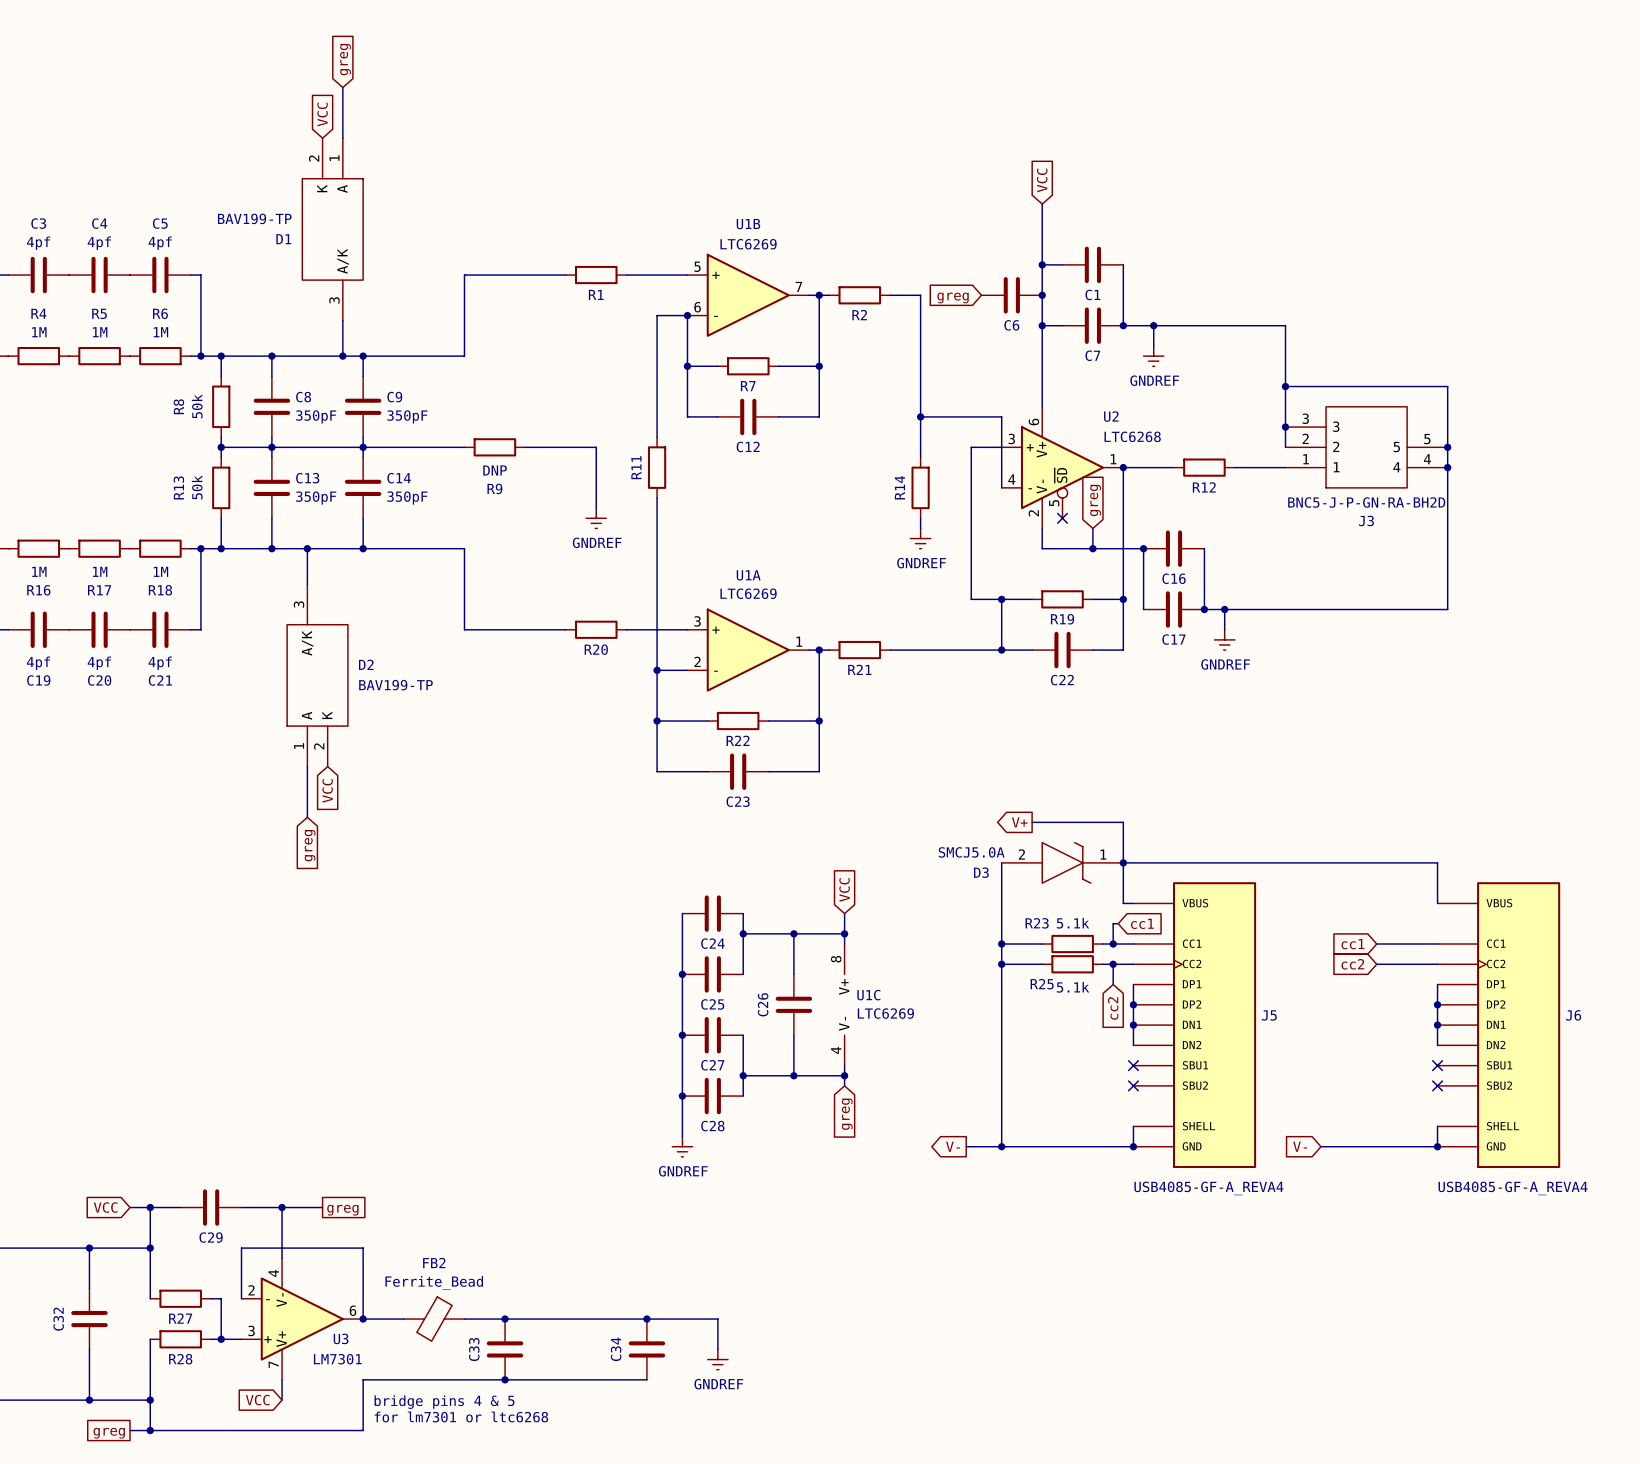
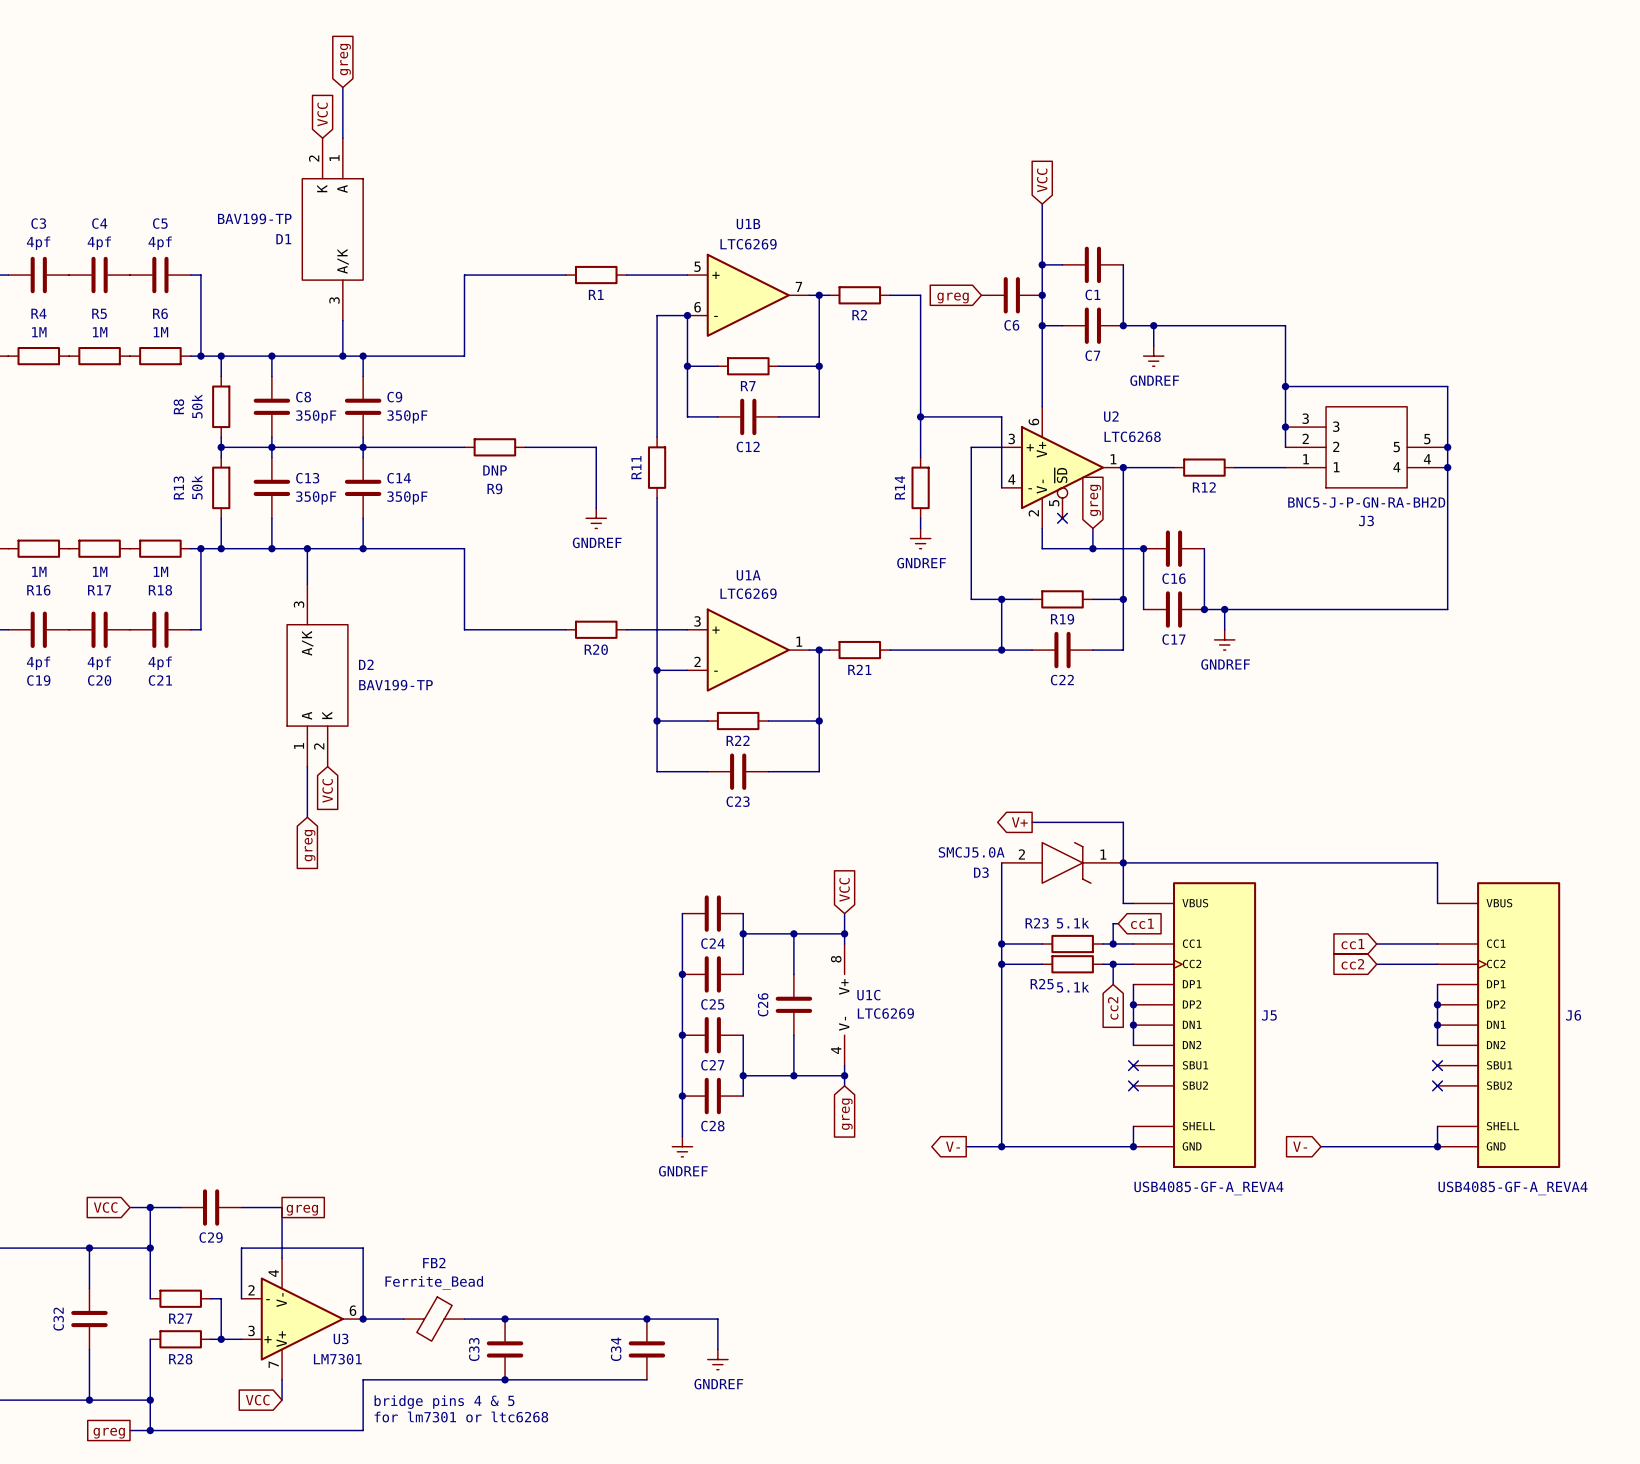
wire: (282, 1207) (322, 1207) -> none
junction: (282, 1207) -> none
global label position: greg (342, 1210) -> greg (302, 1210)

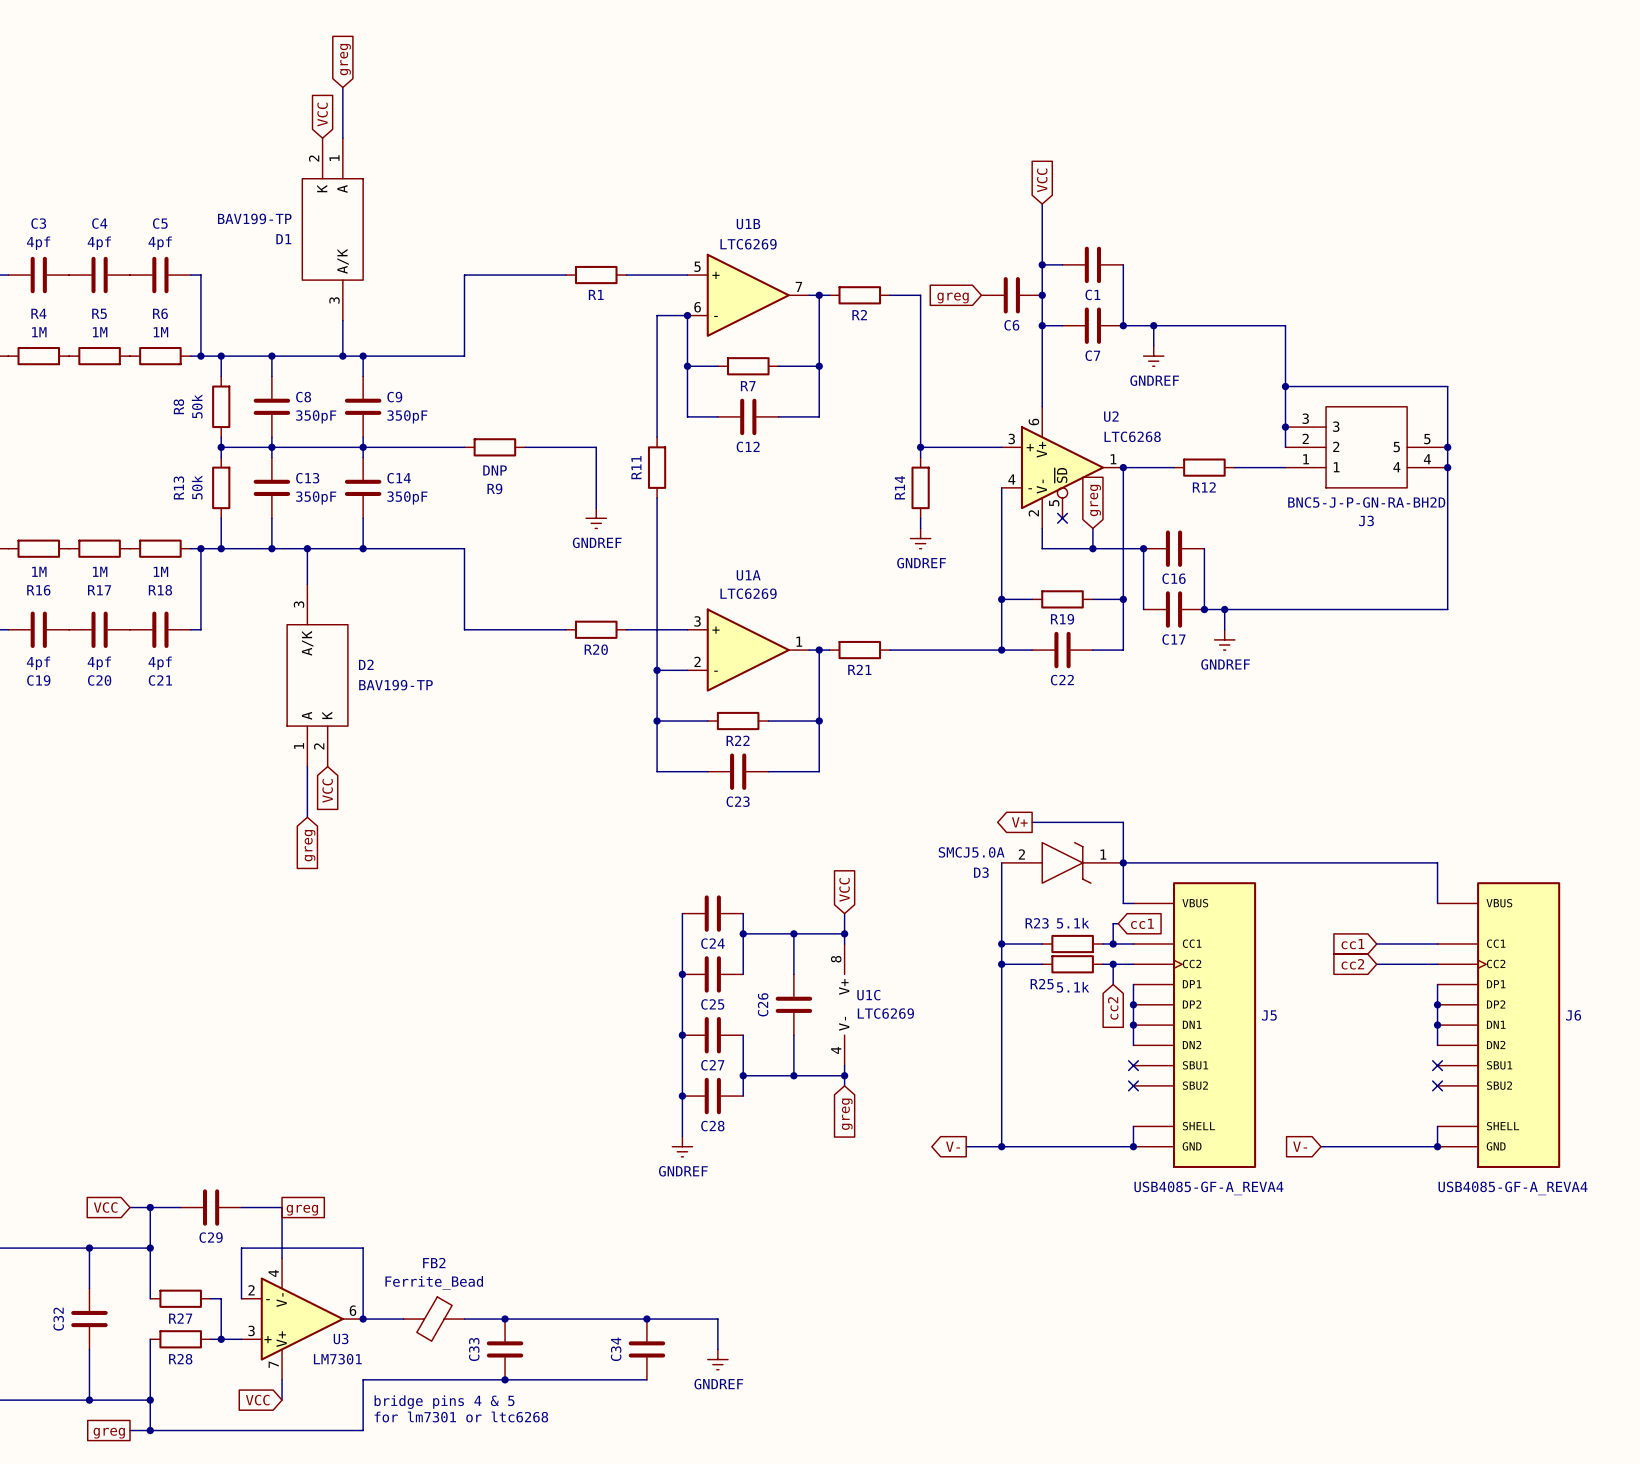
wire: (920, 416) (1001, 416) (1001, 487) -> none
junction position: (920, 416) -> (920, 447)
wire: none -> (920, 447) (971, 447)
wire: (971, 447) (971, 599) (1001, 599) -> (1001, 487) (1001, 599)

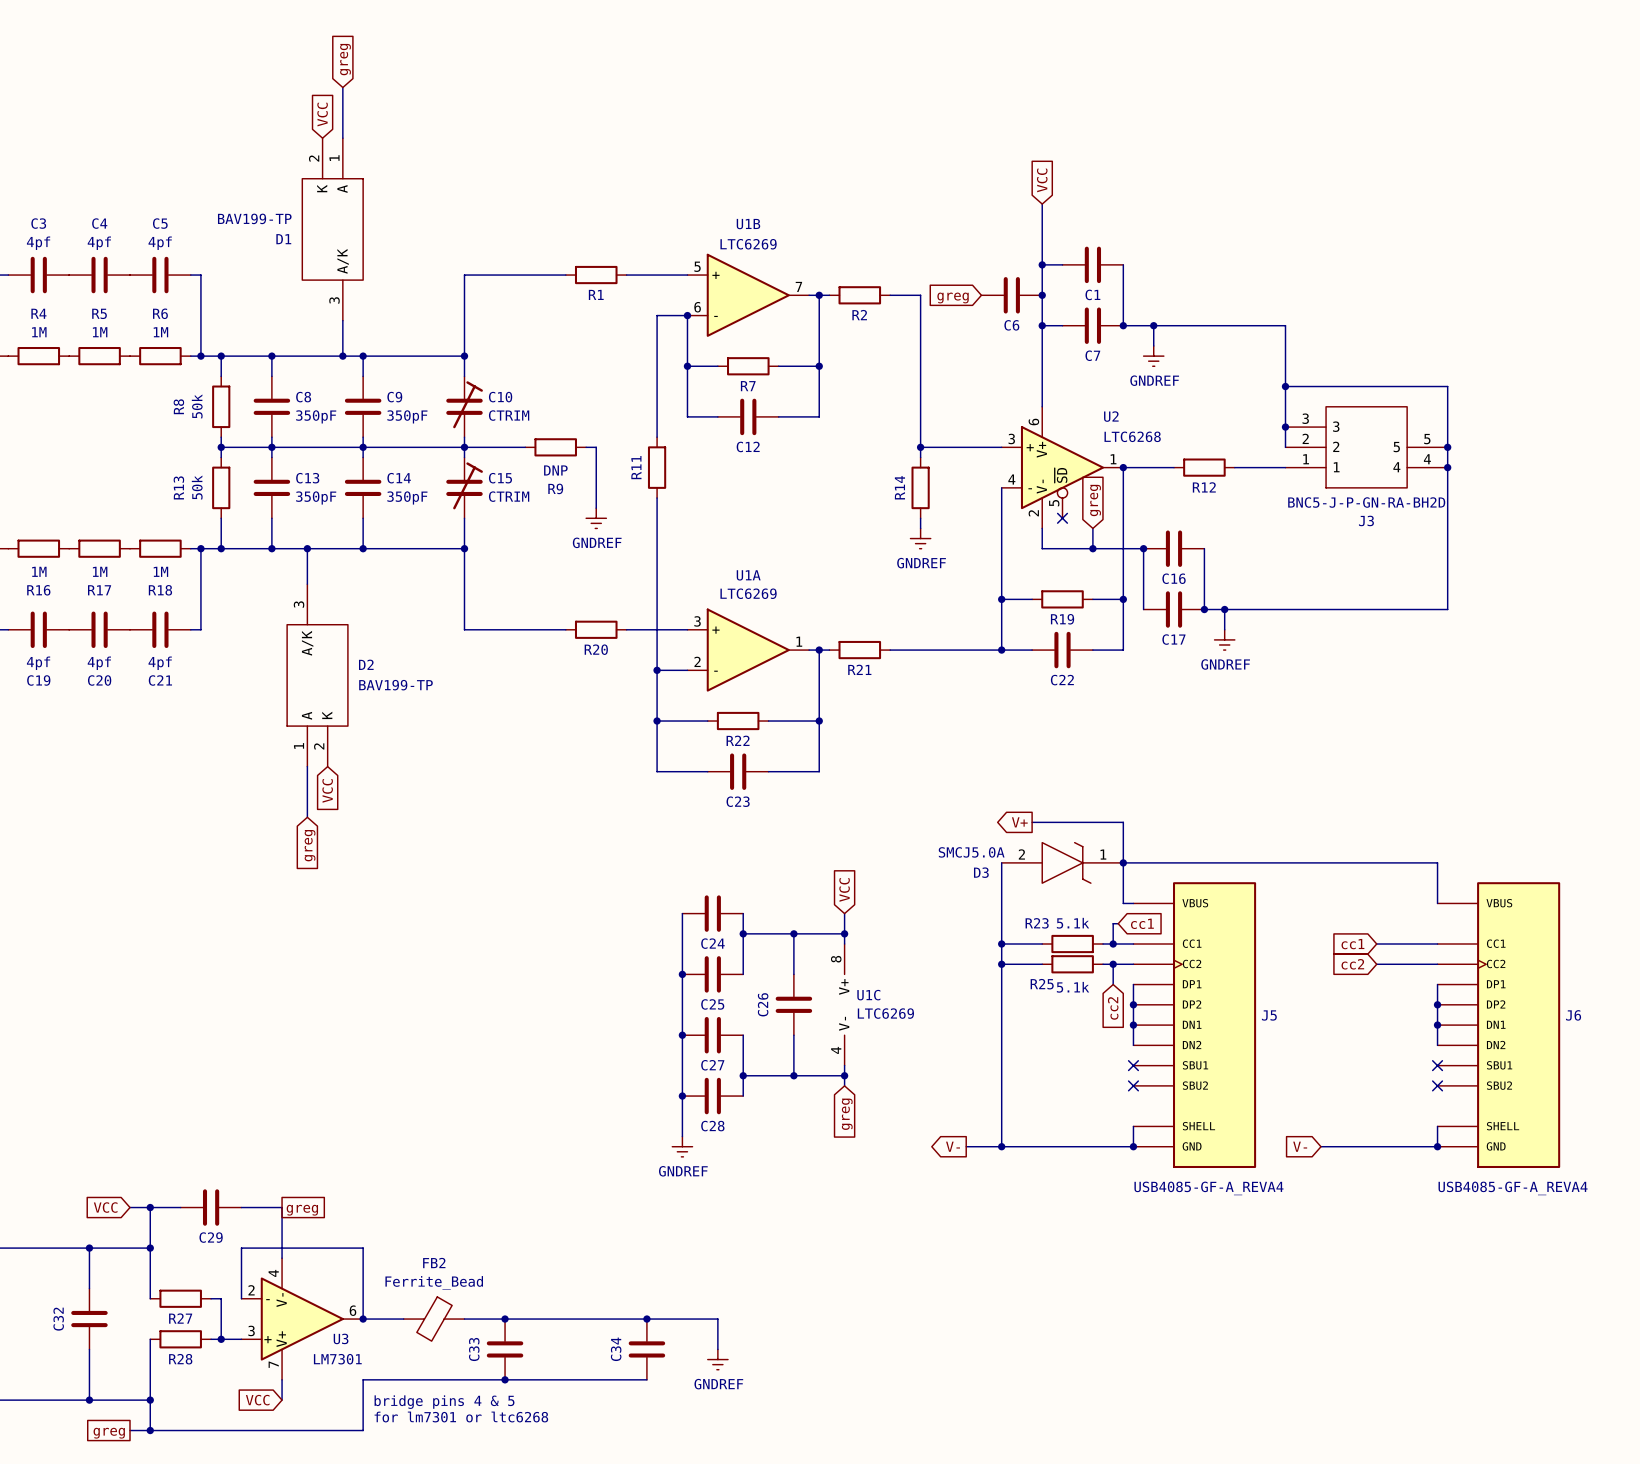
wire: none -> (464, 356) (464, 376)
junction: none -> (464, 356)
C10: none -> CTRIM (464, 406)
wire: none -> (464, 437) (464, 457)
junction: none -> (464, 447)
R9 position: (494, 447) -> (555, 447)
wire: (525, 447) (586, 447) -> (525, 447) (464, 447)
C15: none -> CTRIM (464, 487)
wire: none -> (464, 518) (464, 548)
junction: none -> (464, 548)

